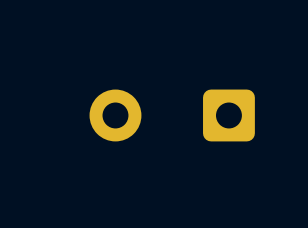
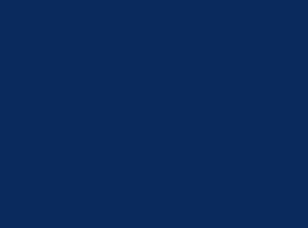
part: (172, 115) -> none

